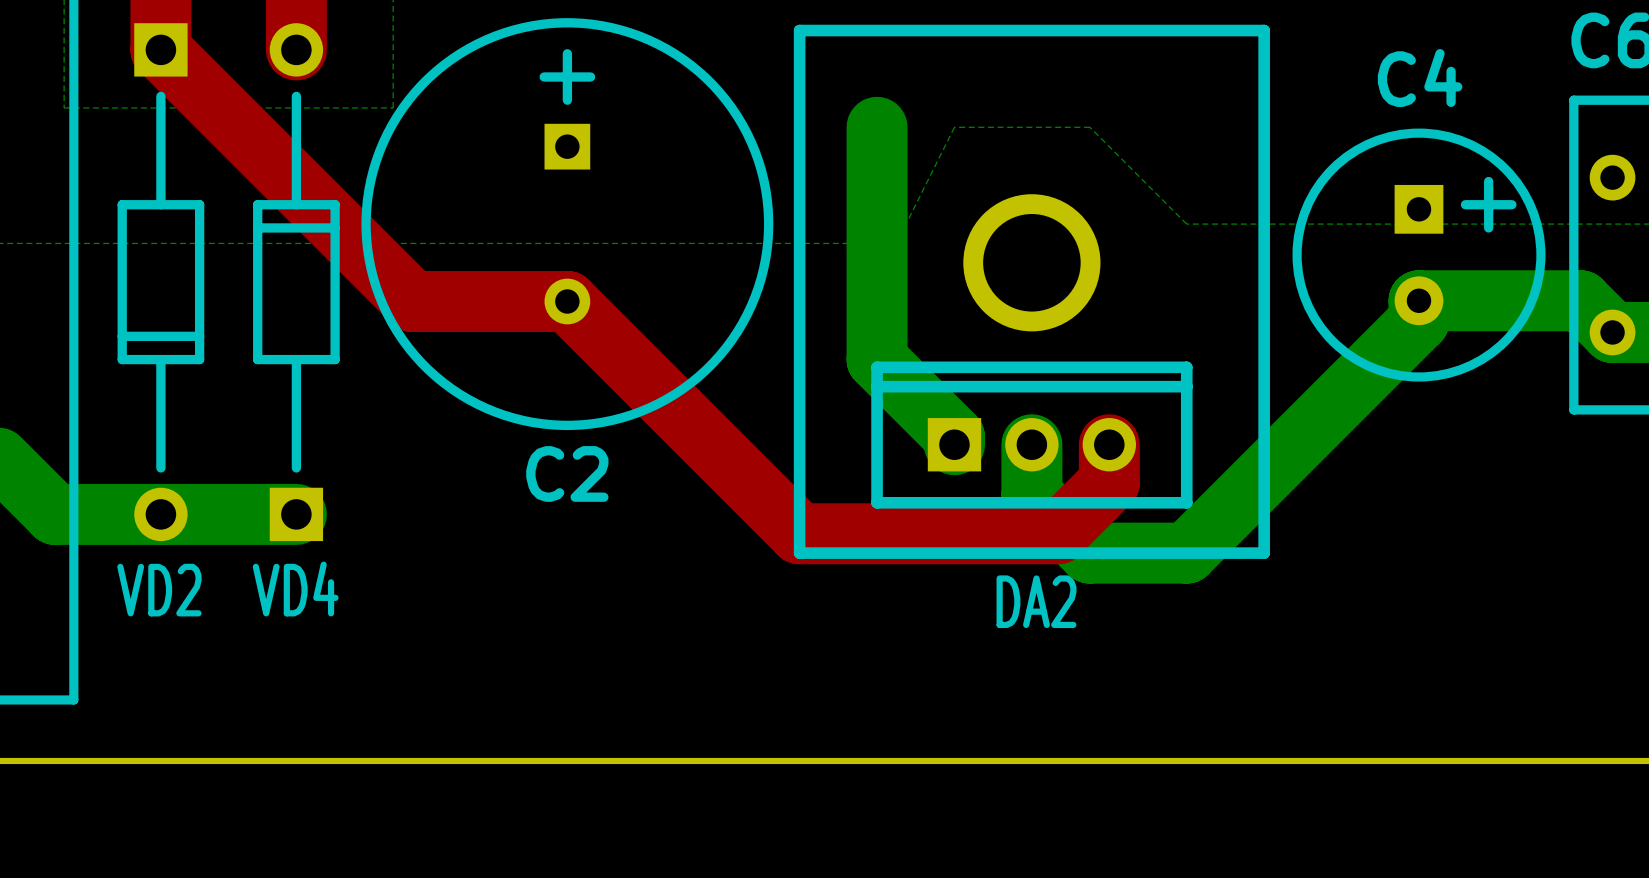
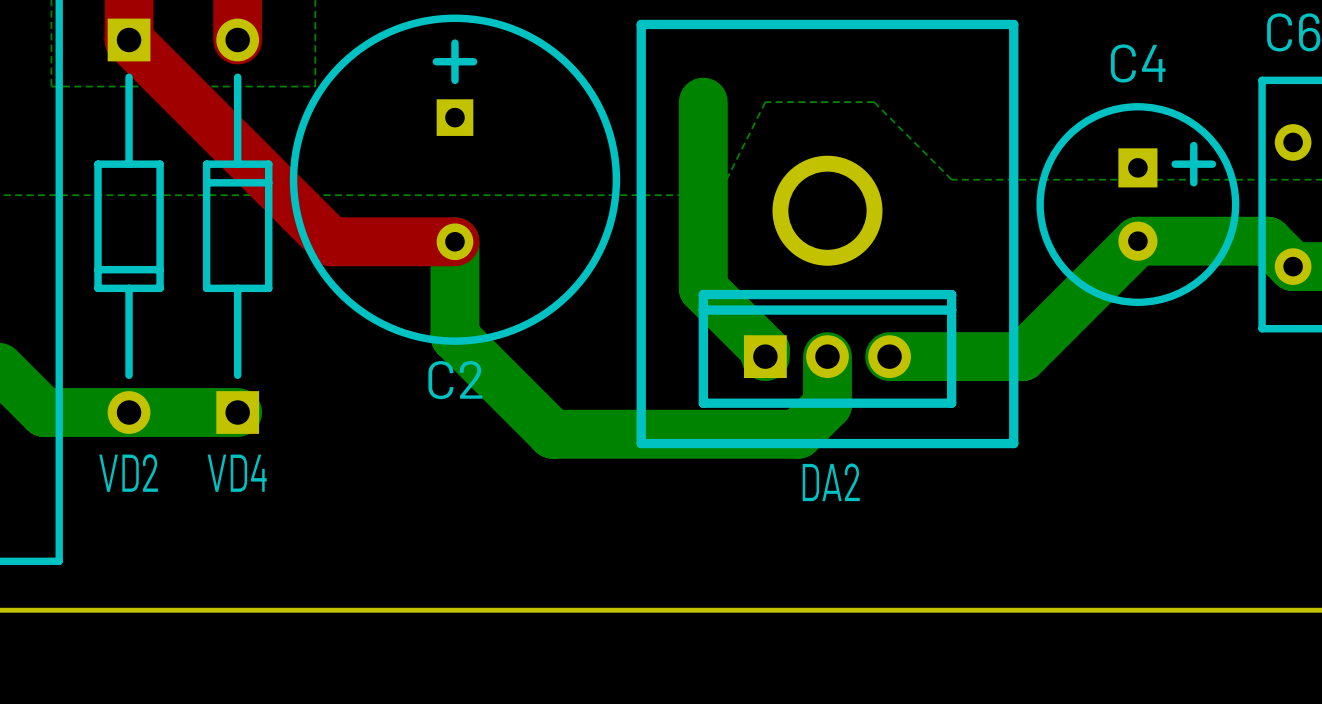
bottom track: (1418, 300) (1418, 320) (1186, 553) (1089, 553) (1031, 495) -> (1137, 241) (1022, 356) (889, 356)
bottom track: none -> (454, 241) (454, 336) (552, 434) (798, 434) (827, 404) (827, 396)
top track: (567, 301) (799, 533) (1058, 533) (1109, 482) (1109, 444) -> none

